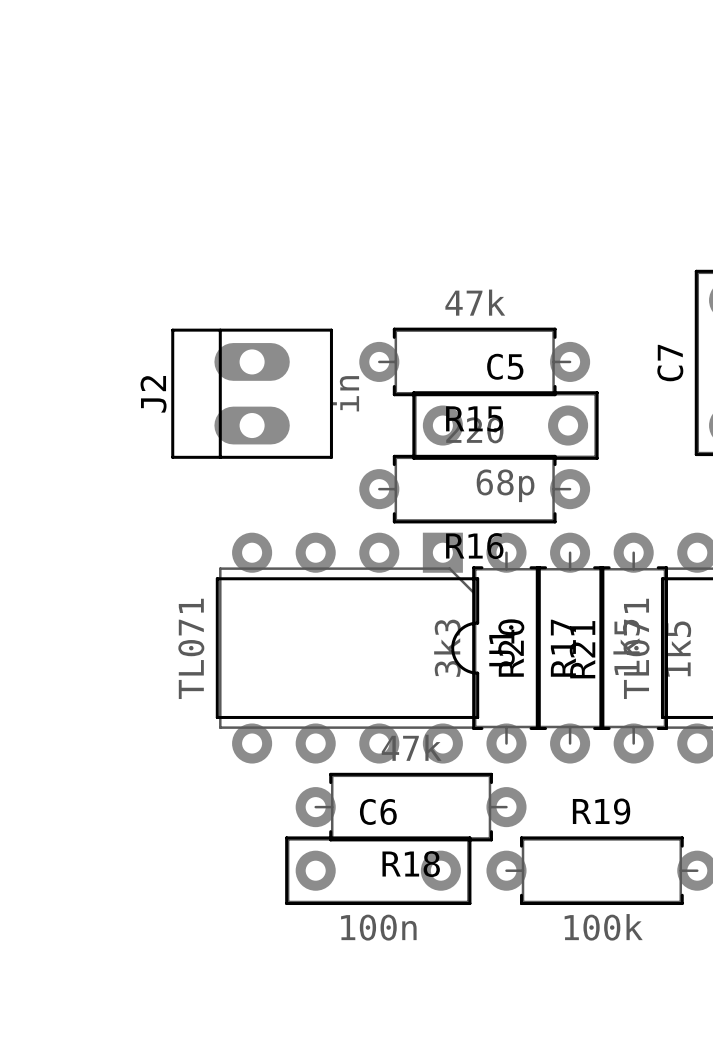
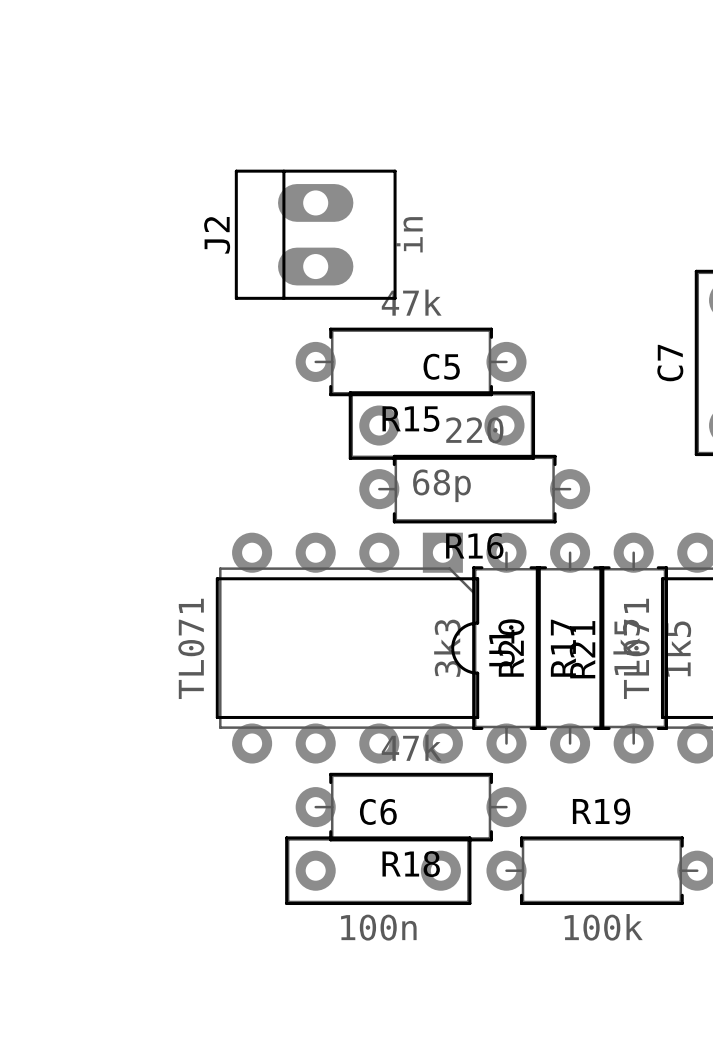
R15 position: (474, 361) -> (411, 361)
J2 position: (252, 393) -> (315, 234)
C5 position: (505, 425) -> (441, 425)

